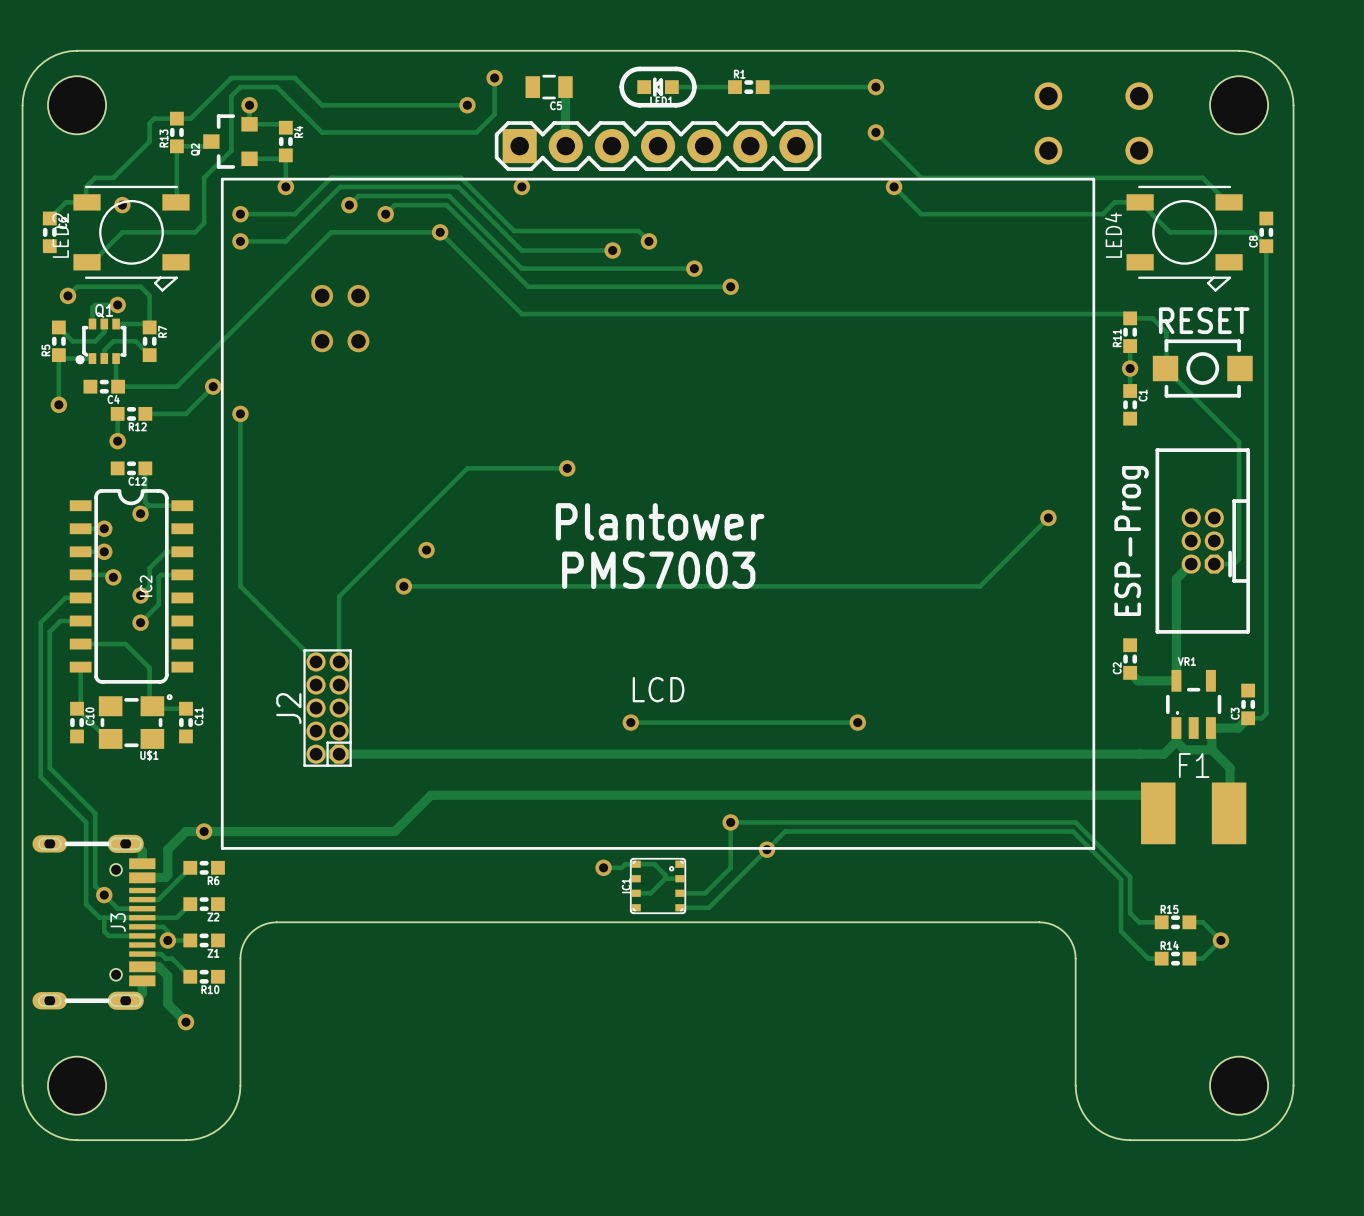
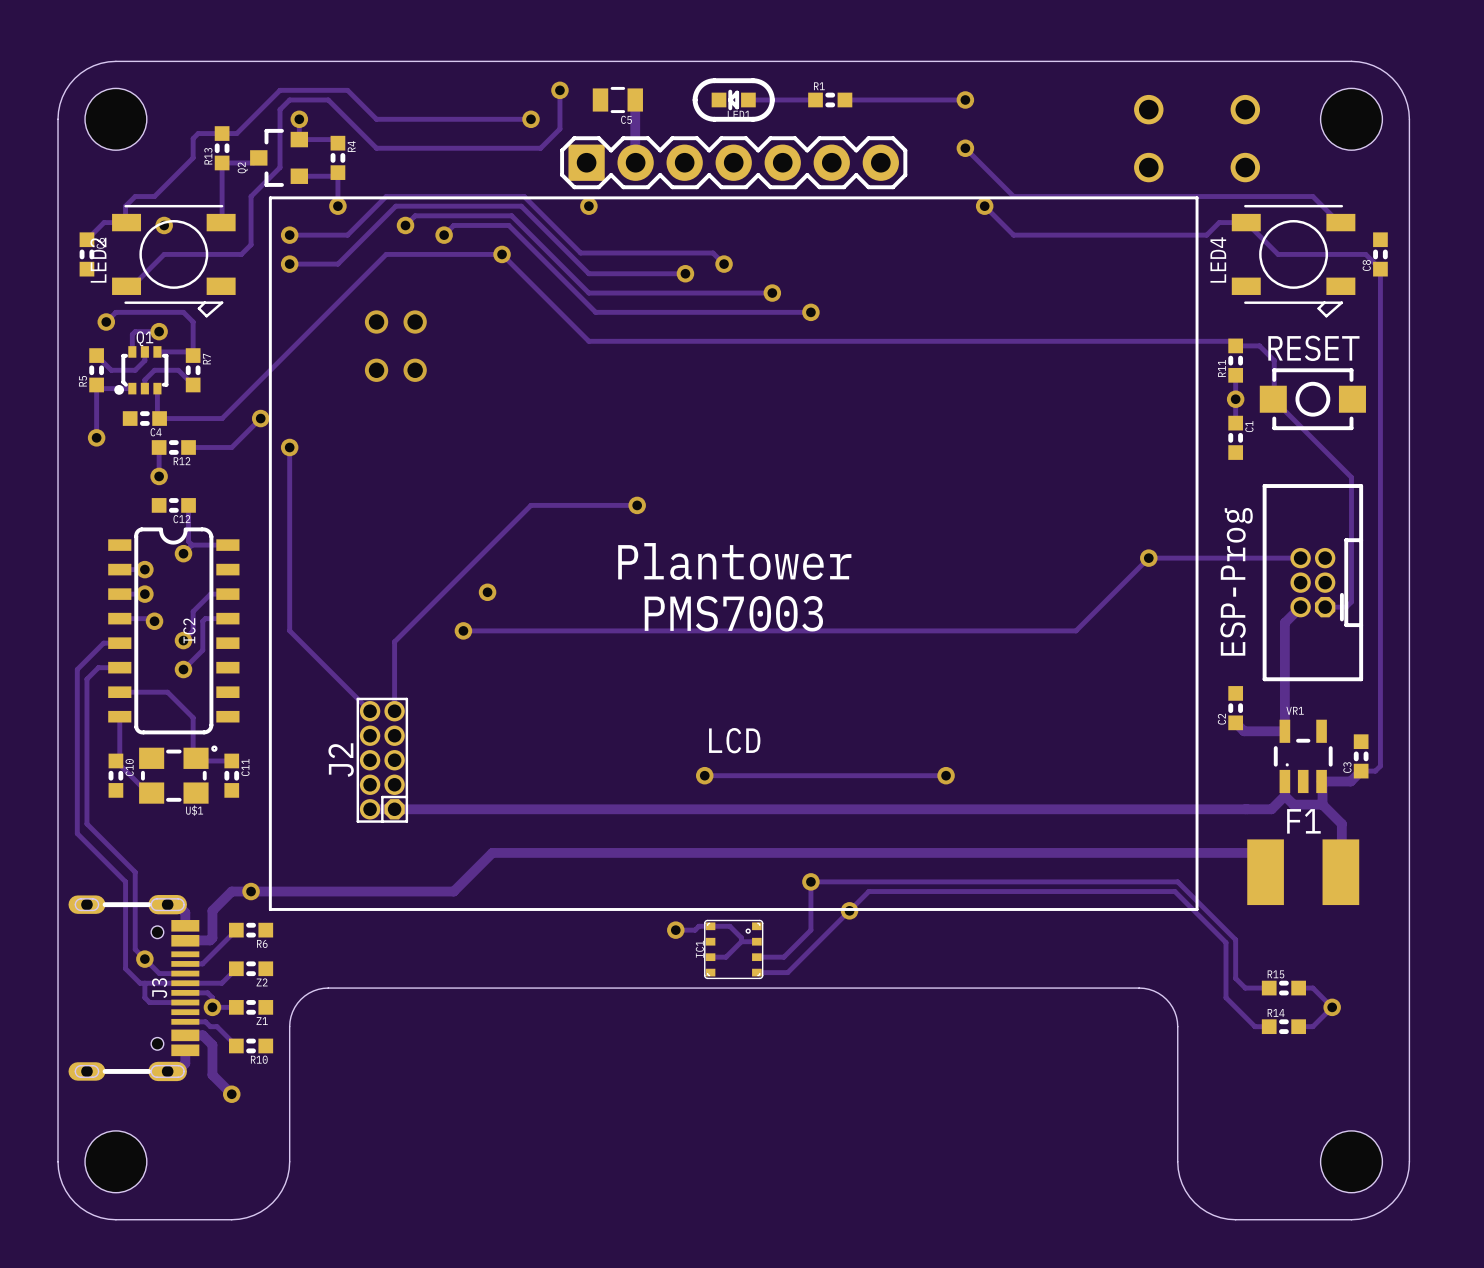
track: none -> (1148, 558) (1300, 558)

